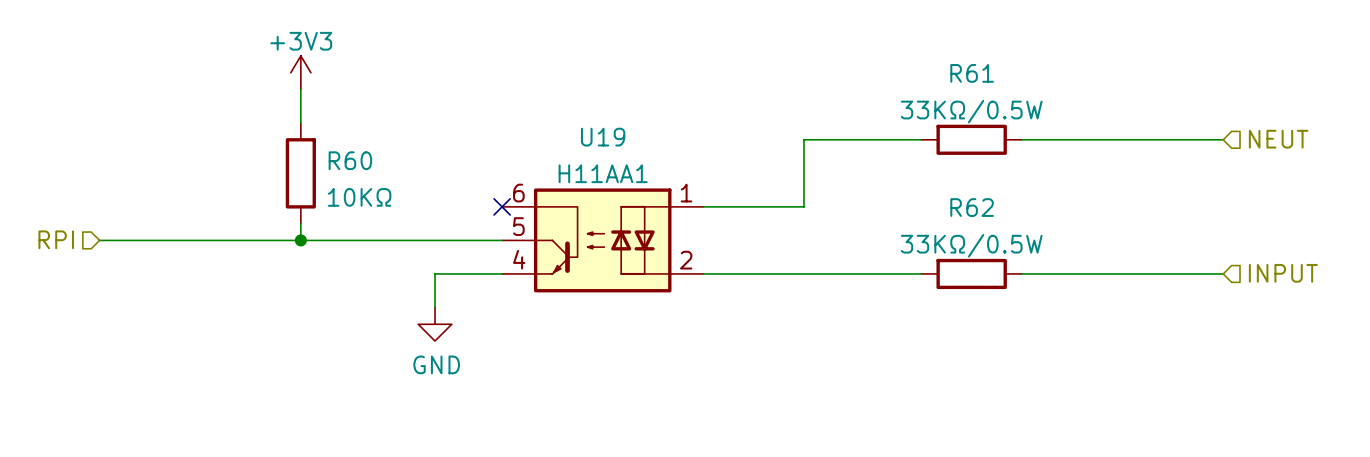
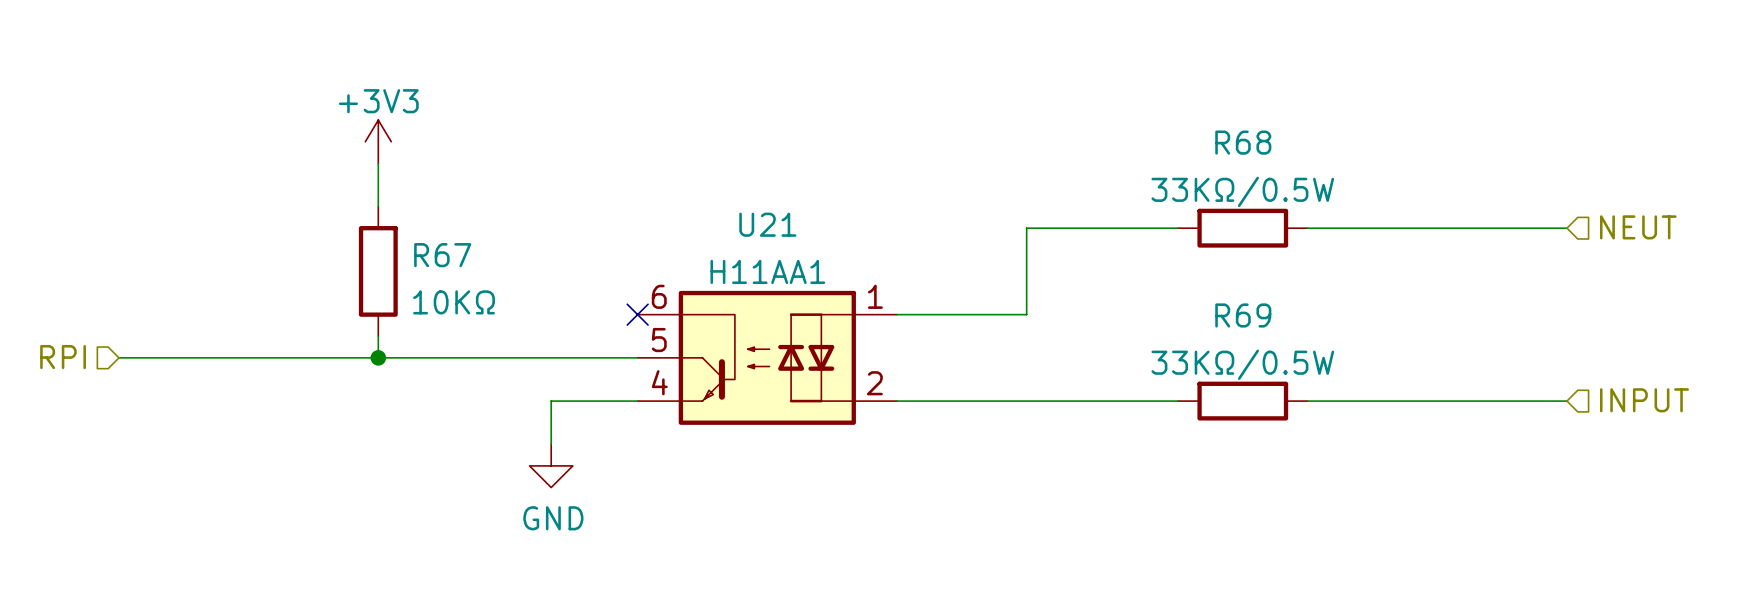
R61 name: R61 (972, 73) -> R68 (1243, 142)
U19 name: U19 (603, 137) -> U21 (767, 224)
R60 name: R60 (350, 160) -> R67 (442, 255)
R62 name: R62 (972, 207) -> R69 (1243, 315)

